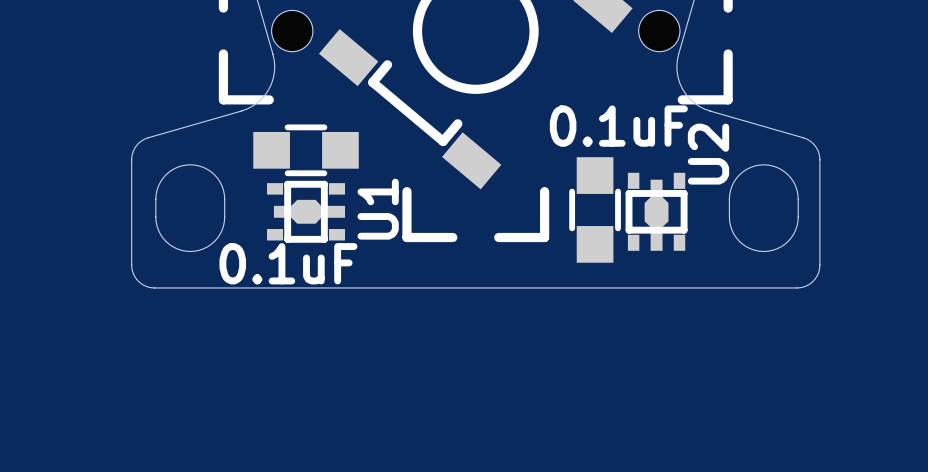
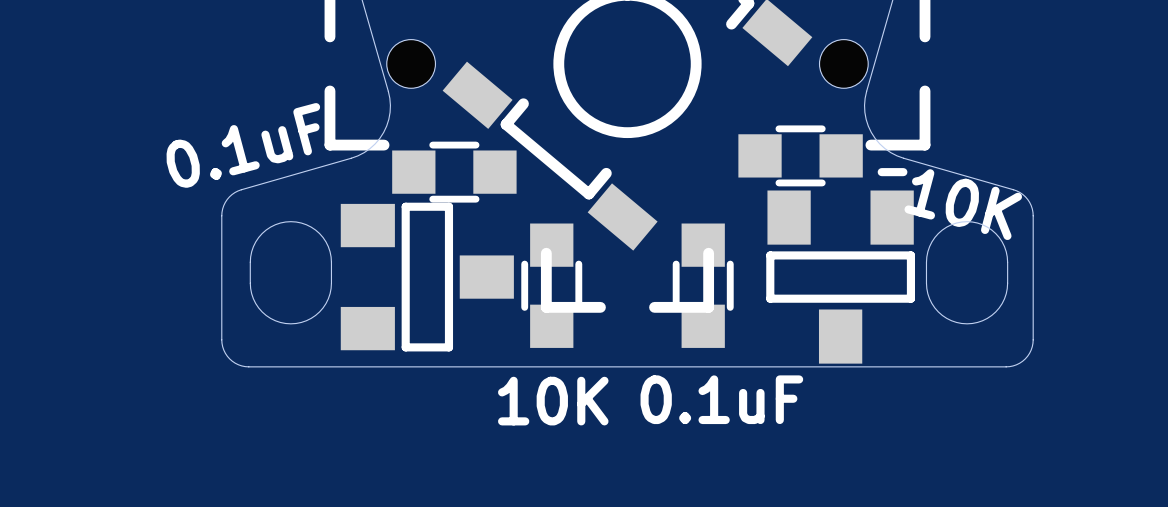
part: none -> 10K (800, 155)
line: none -> (881, 172) (903, 172)
part value position: 0.1uF (618, 126) -> 0.1uF (721, 399)
part position: (306, 150) -> (454, 172)
part position: (595, 209) -> (703, 285)
U1: (306, 211) -> none
part: none -> (427, 277)
U2: (656, 211) -> none
part: none -> (840, 277)
part: none -> 10K (551, 285)
part value rotation: 0° (288, 263) -> 15° counterclockwise (243, 145)
part value position: 0.1uF (288, 263) -> 0.1uF (243, 145)

